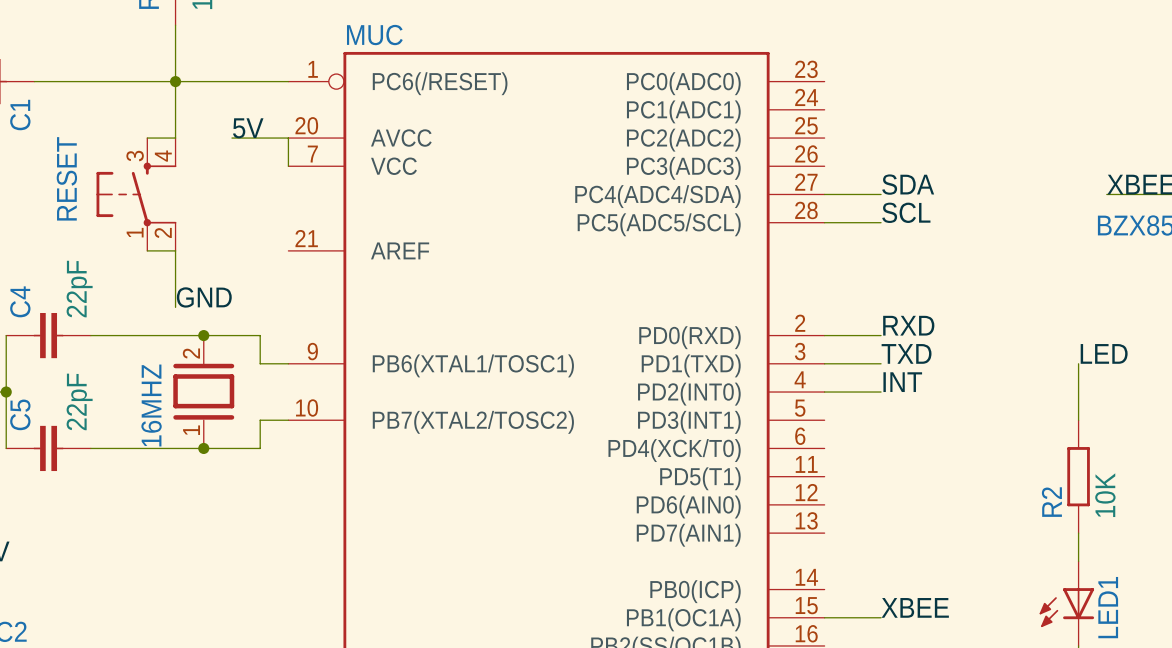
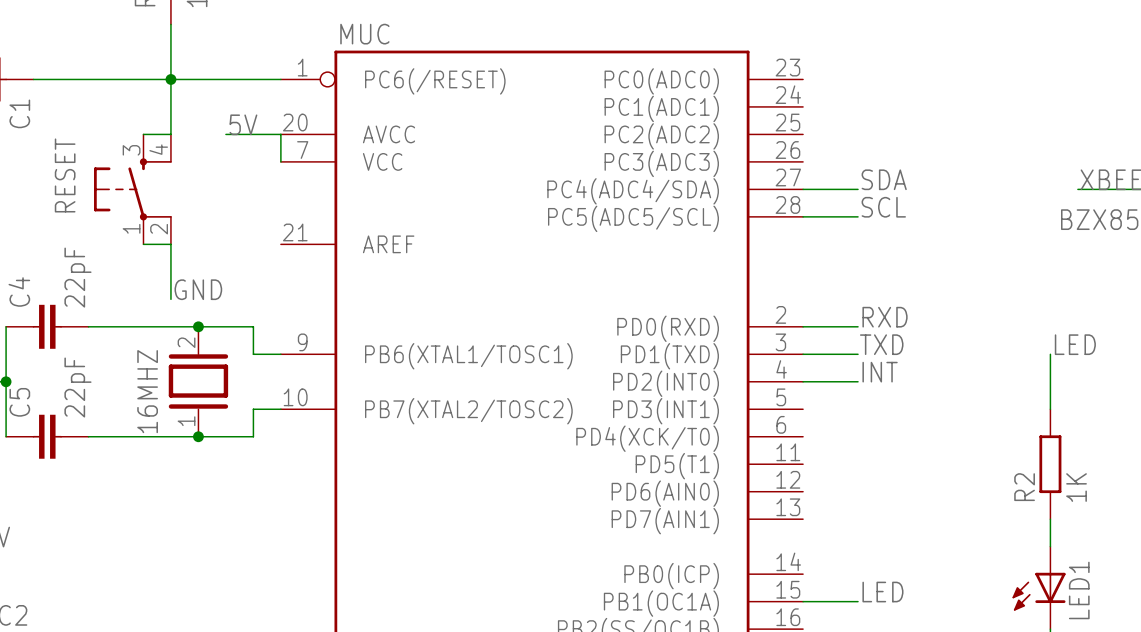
R2 value: 10K (1105, 495) -> 1K (1076, 487)
label: XBEE (915, 607) -> LED (882, 592)

